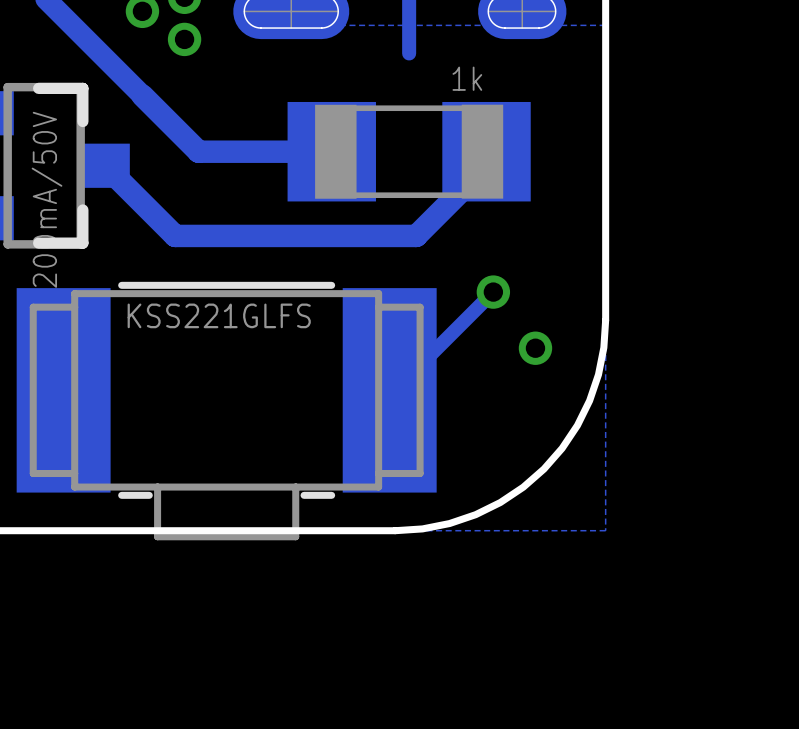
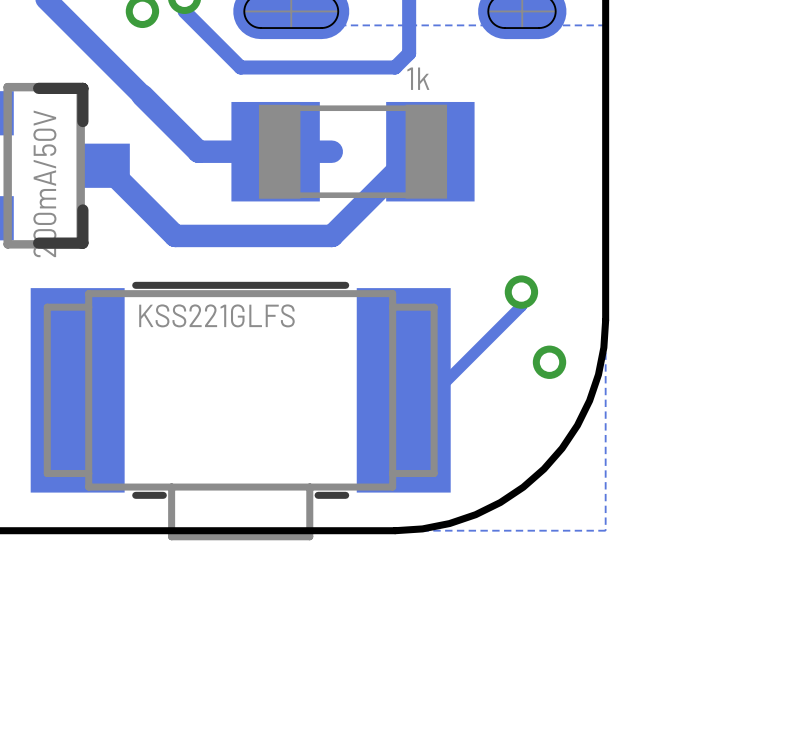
track: none -> (184, 11) (240, 67) (395, 67) (409, 53)
via: (184, 39) -> none
part position: (409, 151) -> (352, 151)
track: (486, 151) (486, 165) (416, 235) (332, 235) -> (430, 151) (416, 151) (332, 235)
track: (493, 292) (395, 390) (389, 390) -> none
via position: (493, 292) -> (521, 292)
track: none -> (521, 292) (521, 306) (437, 390) (403, 390)
via position: (535, 348) -> (549, 362)
part position: (226, 411) -> (240, 411)

